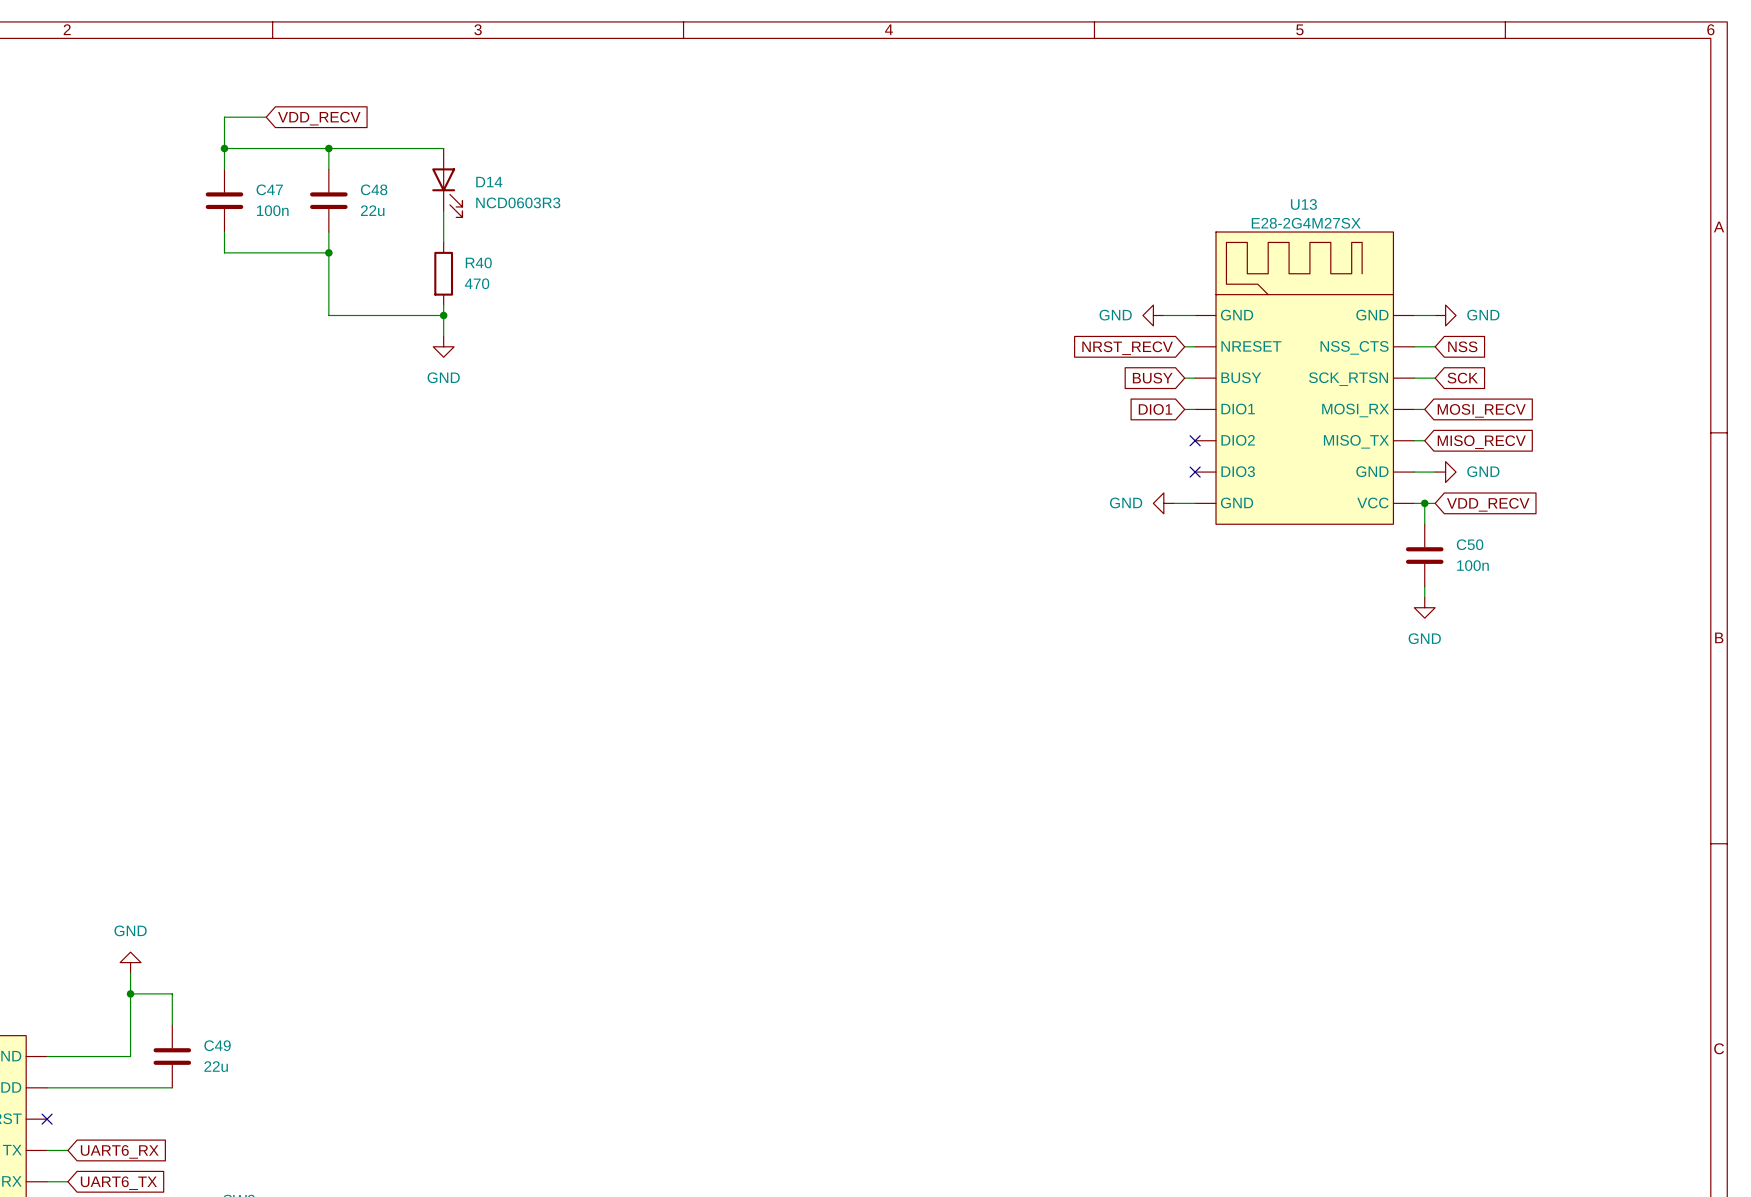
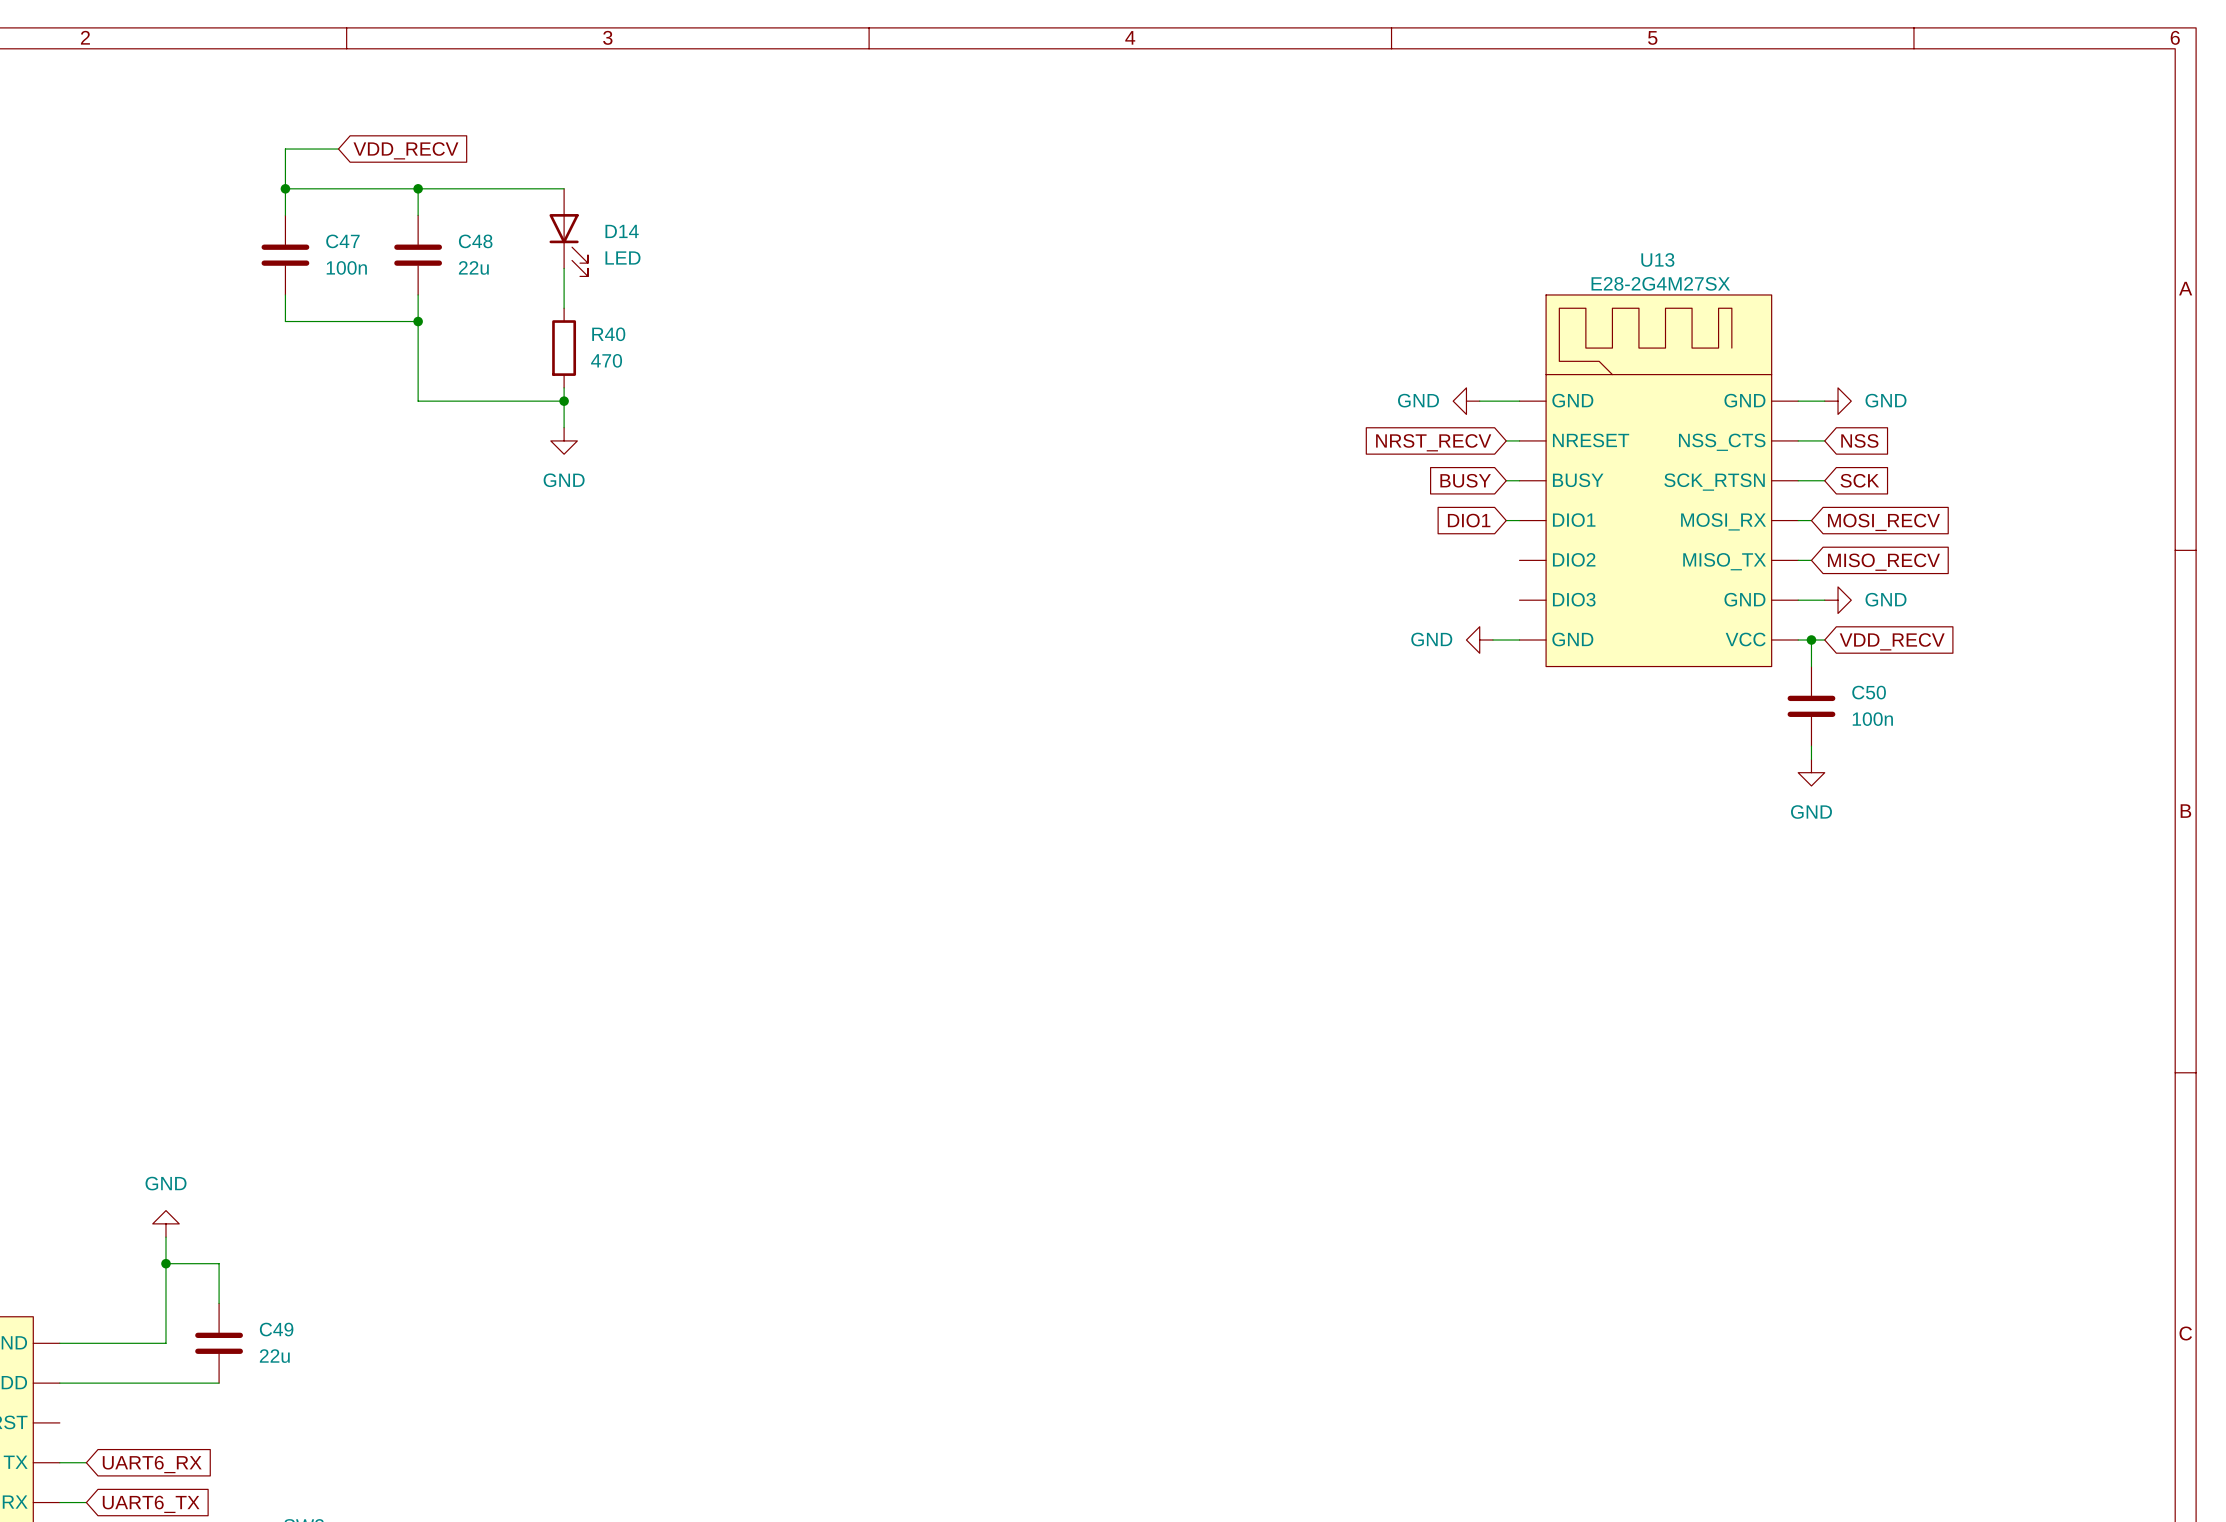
D14 value: NCD0603R3 (518, 202) -> LED (622, 257)
no-connect mark: (1195, 440) -> none
no-connect mark: (1195, 472) -> none
no-connect mark: (47, 1119) -> none

